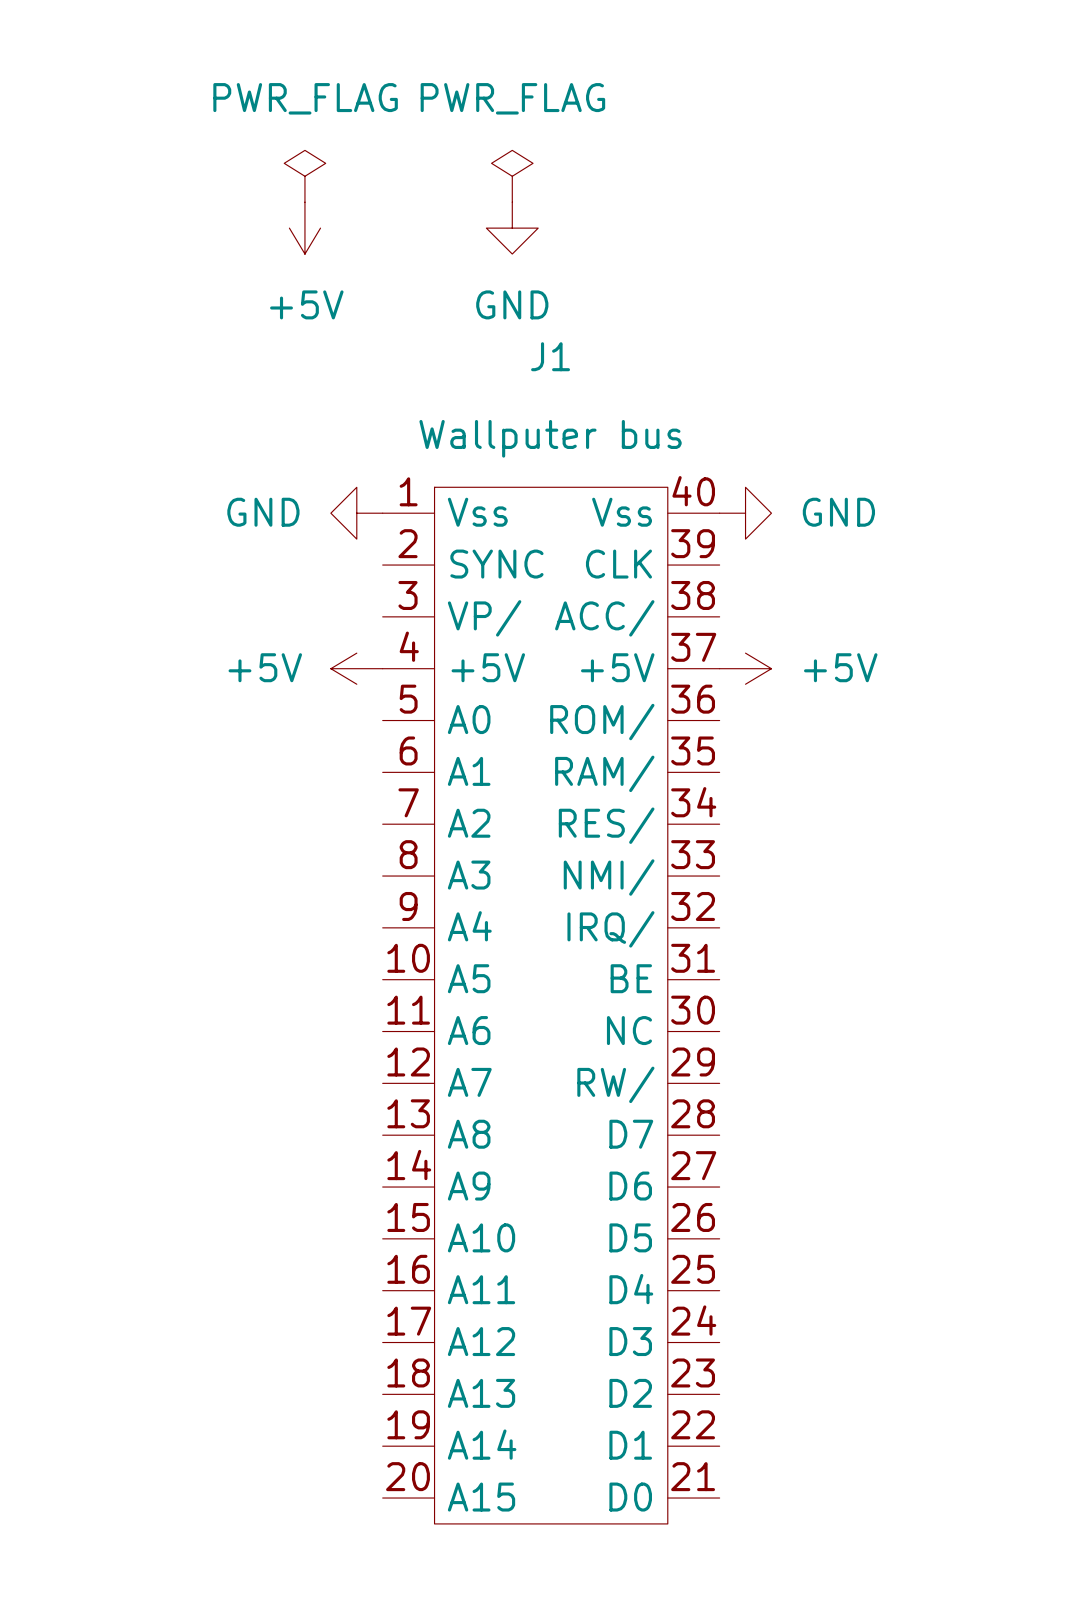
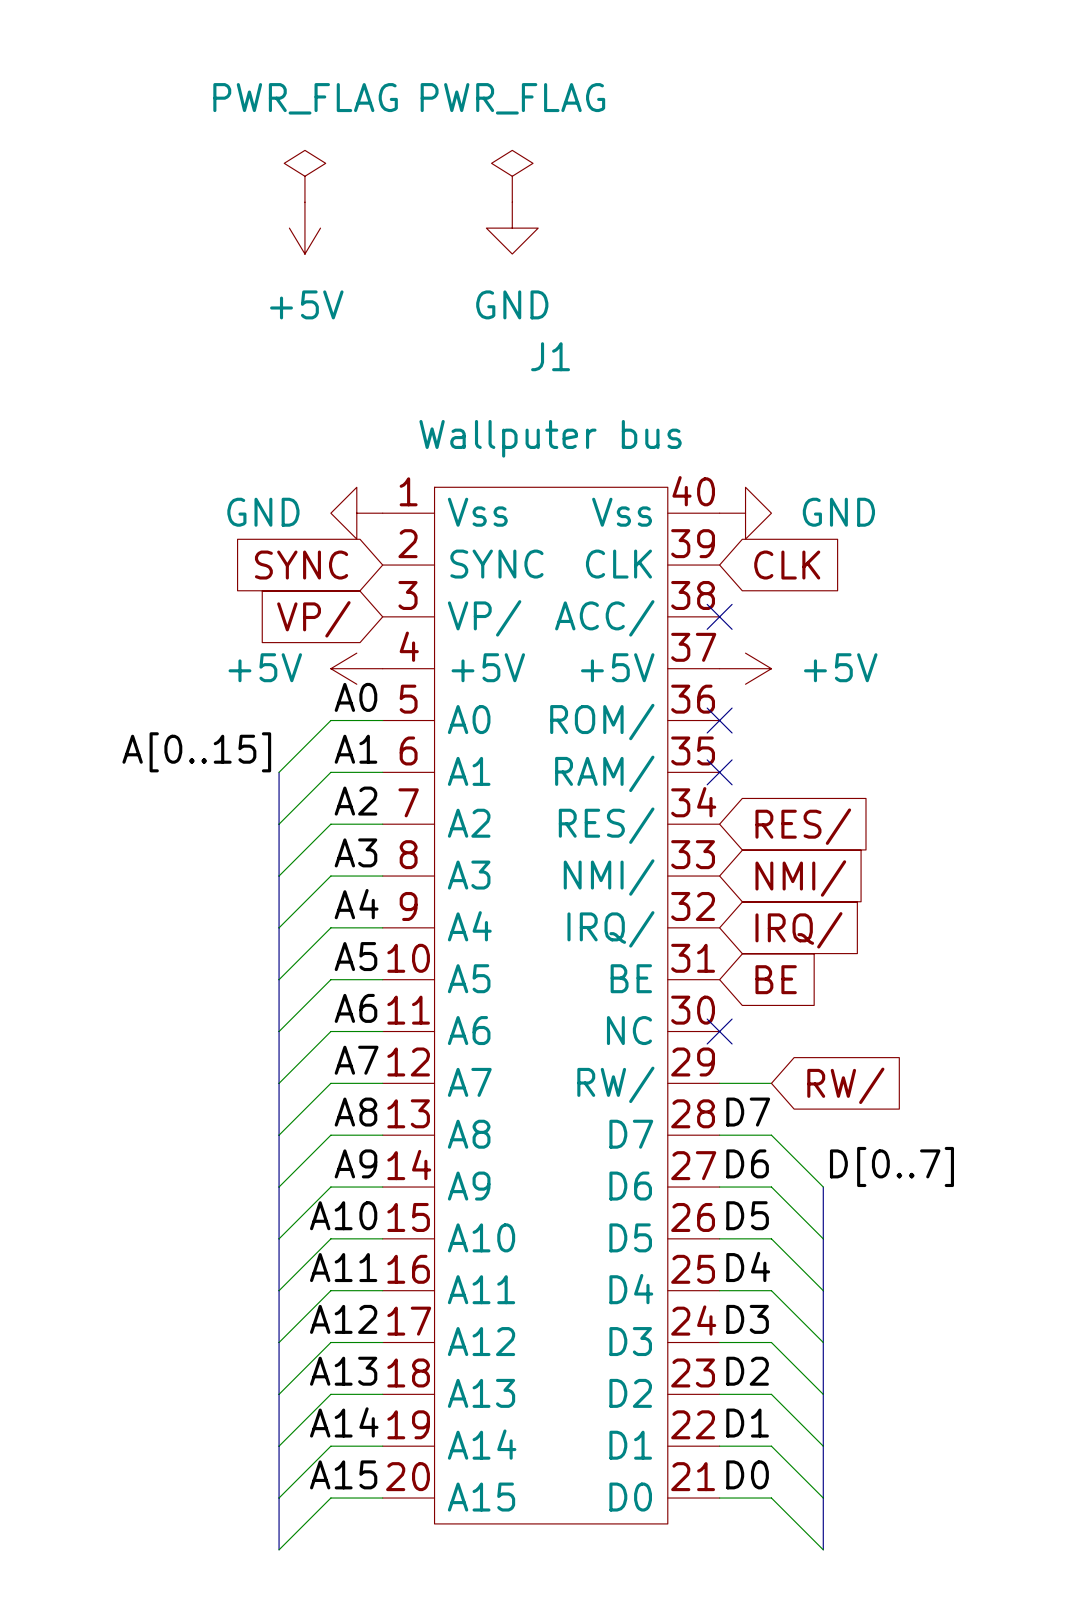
global label: none -> SYNC (301, 565)
global label: none -> CLK (787, 565)
no-connect mark: none -> (719, 616)
global label: none -> VP/ (313, 619)
label: none -> A0 (355, 697)
wire: none -> (382, 720) (330, 720) (279, 772)
no-connect mark: none -> (719, 720)
label: none -> A1 (355, 749)
label: none -> A[0..15] (196, 752)
bus: none -> (279, 772) (279, 1549)
wire: none -> (382, 772) (330, 772) (279, 824)
no-connect mark: none -> (719, 772)
label: none -> A2 (355, 801)
wire: none -> (382, 824) (330, 824) (279, 876)
global label: none -> RES/ (803, 826)
label: none -> A3 (355, 852)
wire: none -> (382, 876) (330, 876) (279, 927)
global label: none -> NMI/ (800, 878)
label: none -> A4 (356, 904)
wire: none -> (382, 927) (330, 927) (279, 979)
global label: none -> IRQ/ (798, 930)
label: none -> A5 (355, 956)
wire: none -> (382, 979) (330, 979) (279, 1031)
global label: none -> BE (776, 979)
label: none -> A6 (355, 1008)
wire: none -> (382, 1031) (330, 1031) (279, 1083)
no-connect mark: none -> (719, 1031)
label: none -> A7 (356, 1060)
wire: none -> (382, 1083) (330, 1083) (279, 1135)
wire: none -> (719, 1083) (771, 1083)
global label: none -> RW/ (845, 1085)
label: none -> A8 (355, 1112)
label: none -> D7 (748, 1112)
wire: none -> (382, 1135) (330, 1135) (279, 1187)
wire: none -> (719, 1135) (771, 1135) (823, 1187)
label: none -> A9 (355, 1163)
label: none -> D6 (747, 1163)
label: none -> D[0..7] (891, 1166)
wire: none -> (382, 1187) (330, 1187) (279, 1238)
wire: none -> (719, 1187) (771, 1187) (823, 1238)
bus: none -> (823, 1187) (823, 1549)
label: none -> A10 (343, 1215)
label: none -> D5 (747, 1215)
wire: none -> (382, 1238) (330, 1238) (279, 1290)
wire: none -> (719, 1238) (771, 1238) (823, 1290)
label: none -> D4 (748, 1266)
label: none -> A11 (343, 1267)
wire: none -> (382, 1290) (330, 1290) (279, 1342)
wire: none -> (719, 1290) (771, 1290) (823, 1342)
label: none -> A12 (343, 1319)
label: none -> D3 (747, 1319)
wire: none -> (382, 1342) (330, 1342) (279, 1394)
wire: none -> (719, 1342) (771, 1342) (823, 1394)
label: none -> A13 (343, 1371)
label: none -> D2 (747, 1371)
wire: none -> (382, 1394) (330, 1394) (279, 1446)
wire: none -> (719, 1394) (771, 1394) (823, 1446)
label: none -> A14 (344, 1422)
label: none -> D1 (747, 1423)
wire: none -> (382, 1446) (330, 1446) (279, 1498)
wire: none -> (719, 1446) (771, 1446) (823, 1498)
label: none -> A15 (343, 1474)
label: none -> D0 (747, 1474)
wire: none -> (382, 1498) (330, 1498) (279, 1549)
wire: none -> (719, 1498) (771, 1498) (823, 1549)

